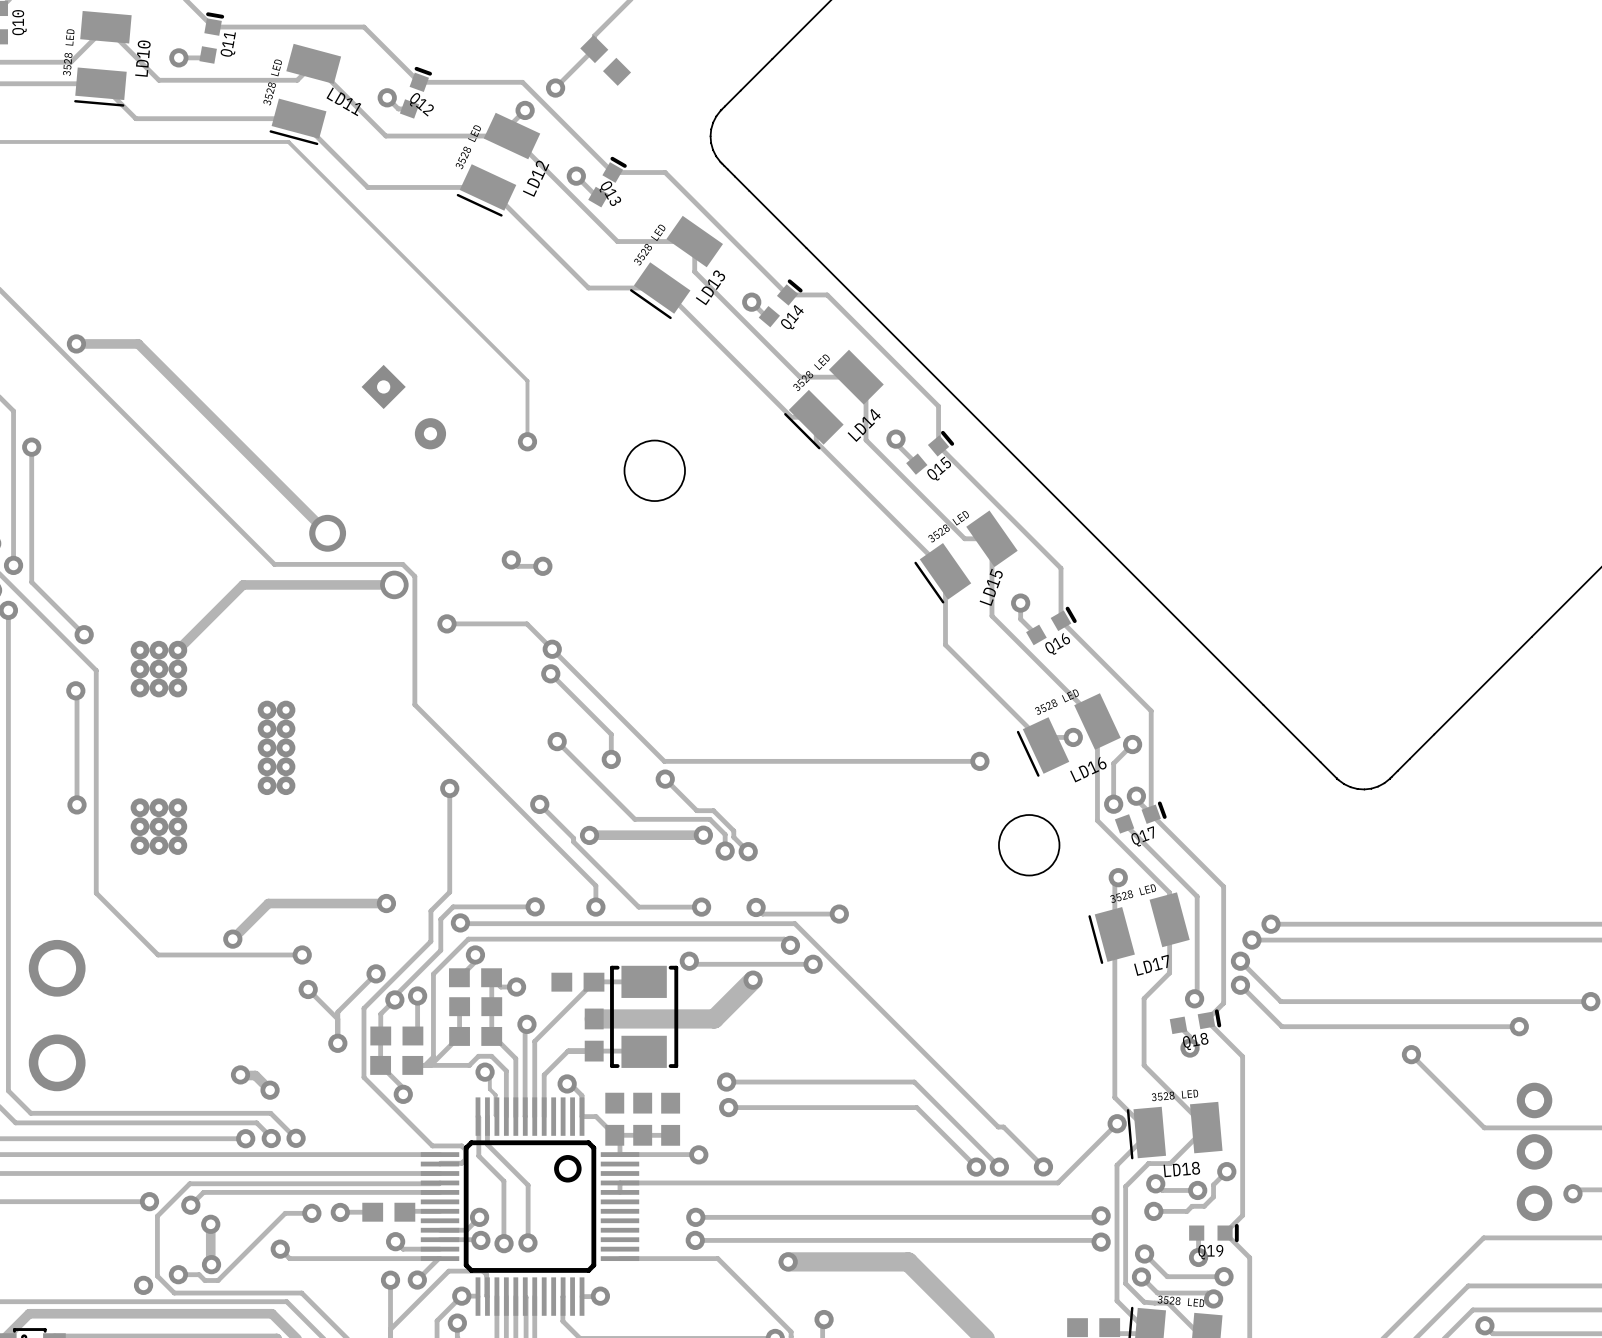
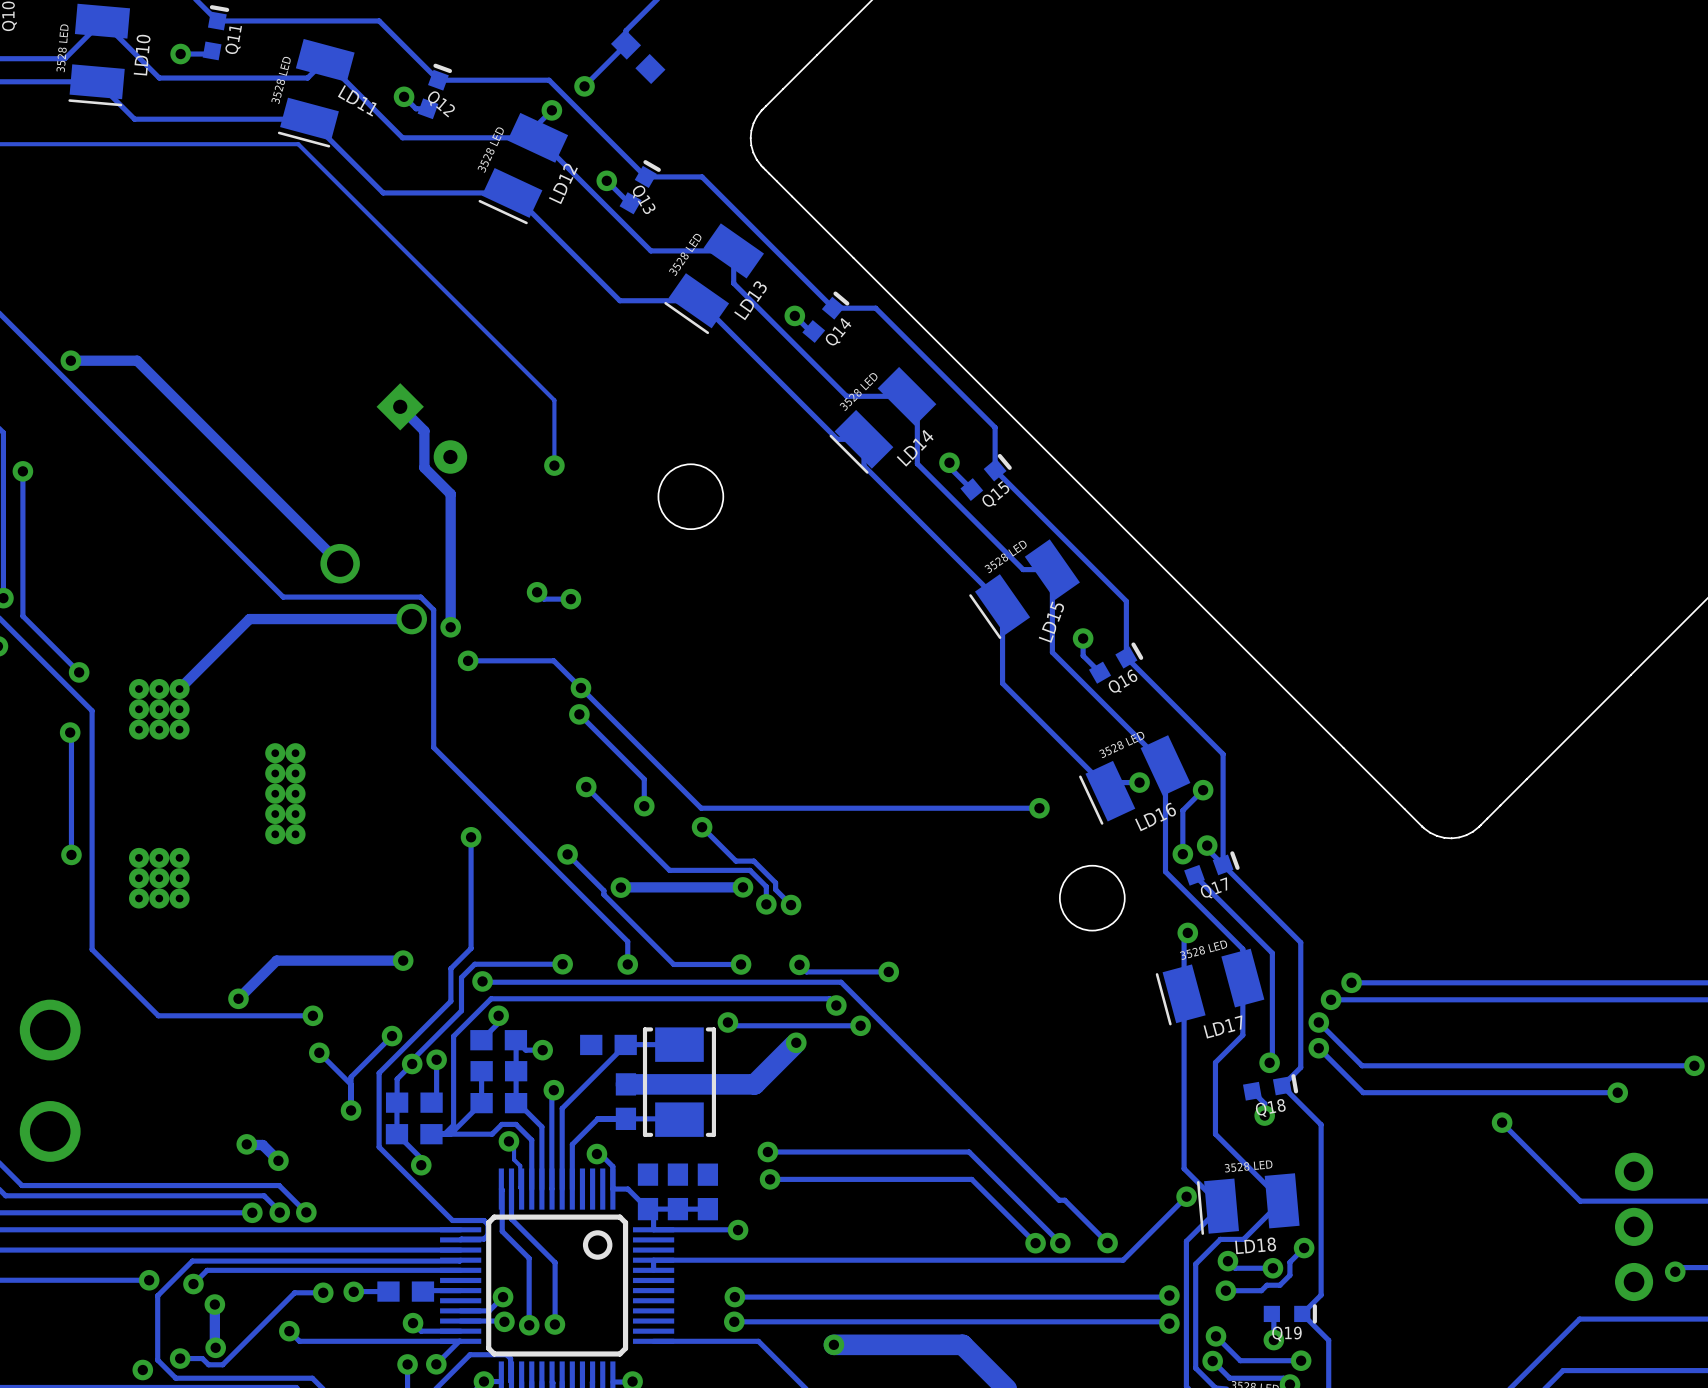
track: none -> (400, 406) (424, 430) (424, 467) (450, 494) (450, 627)
via: none -> (450, 627)

